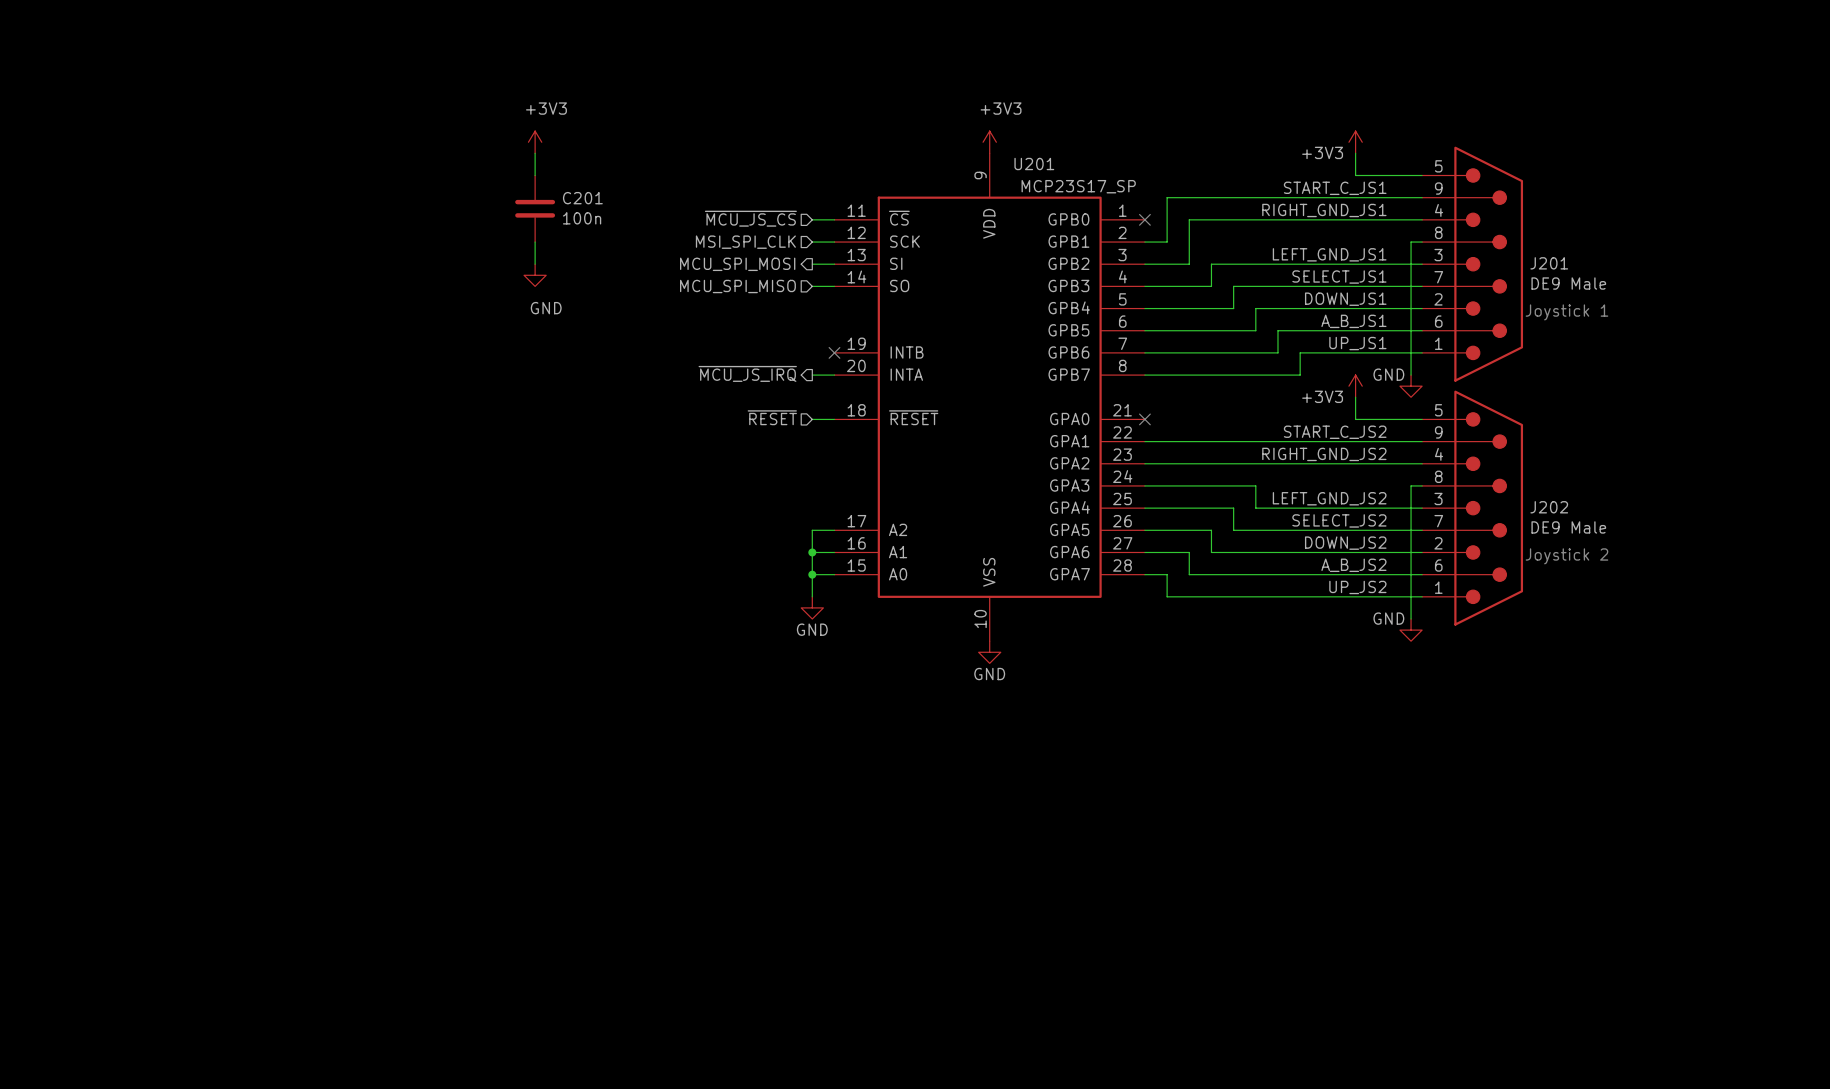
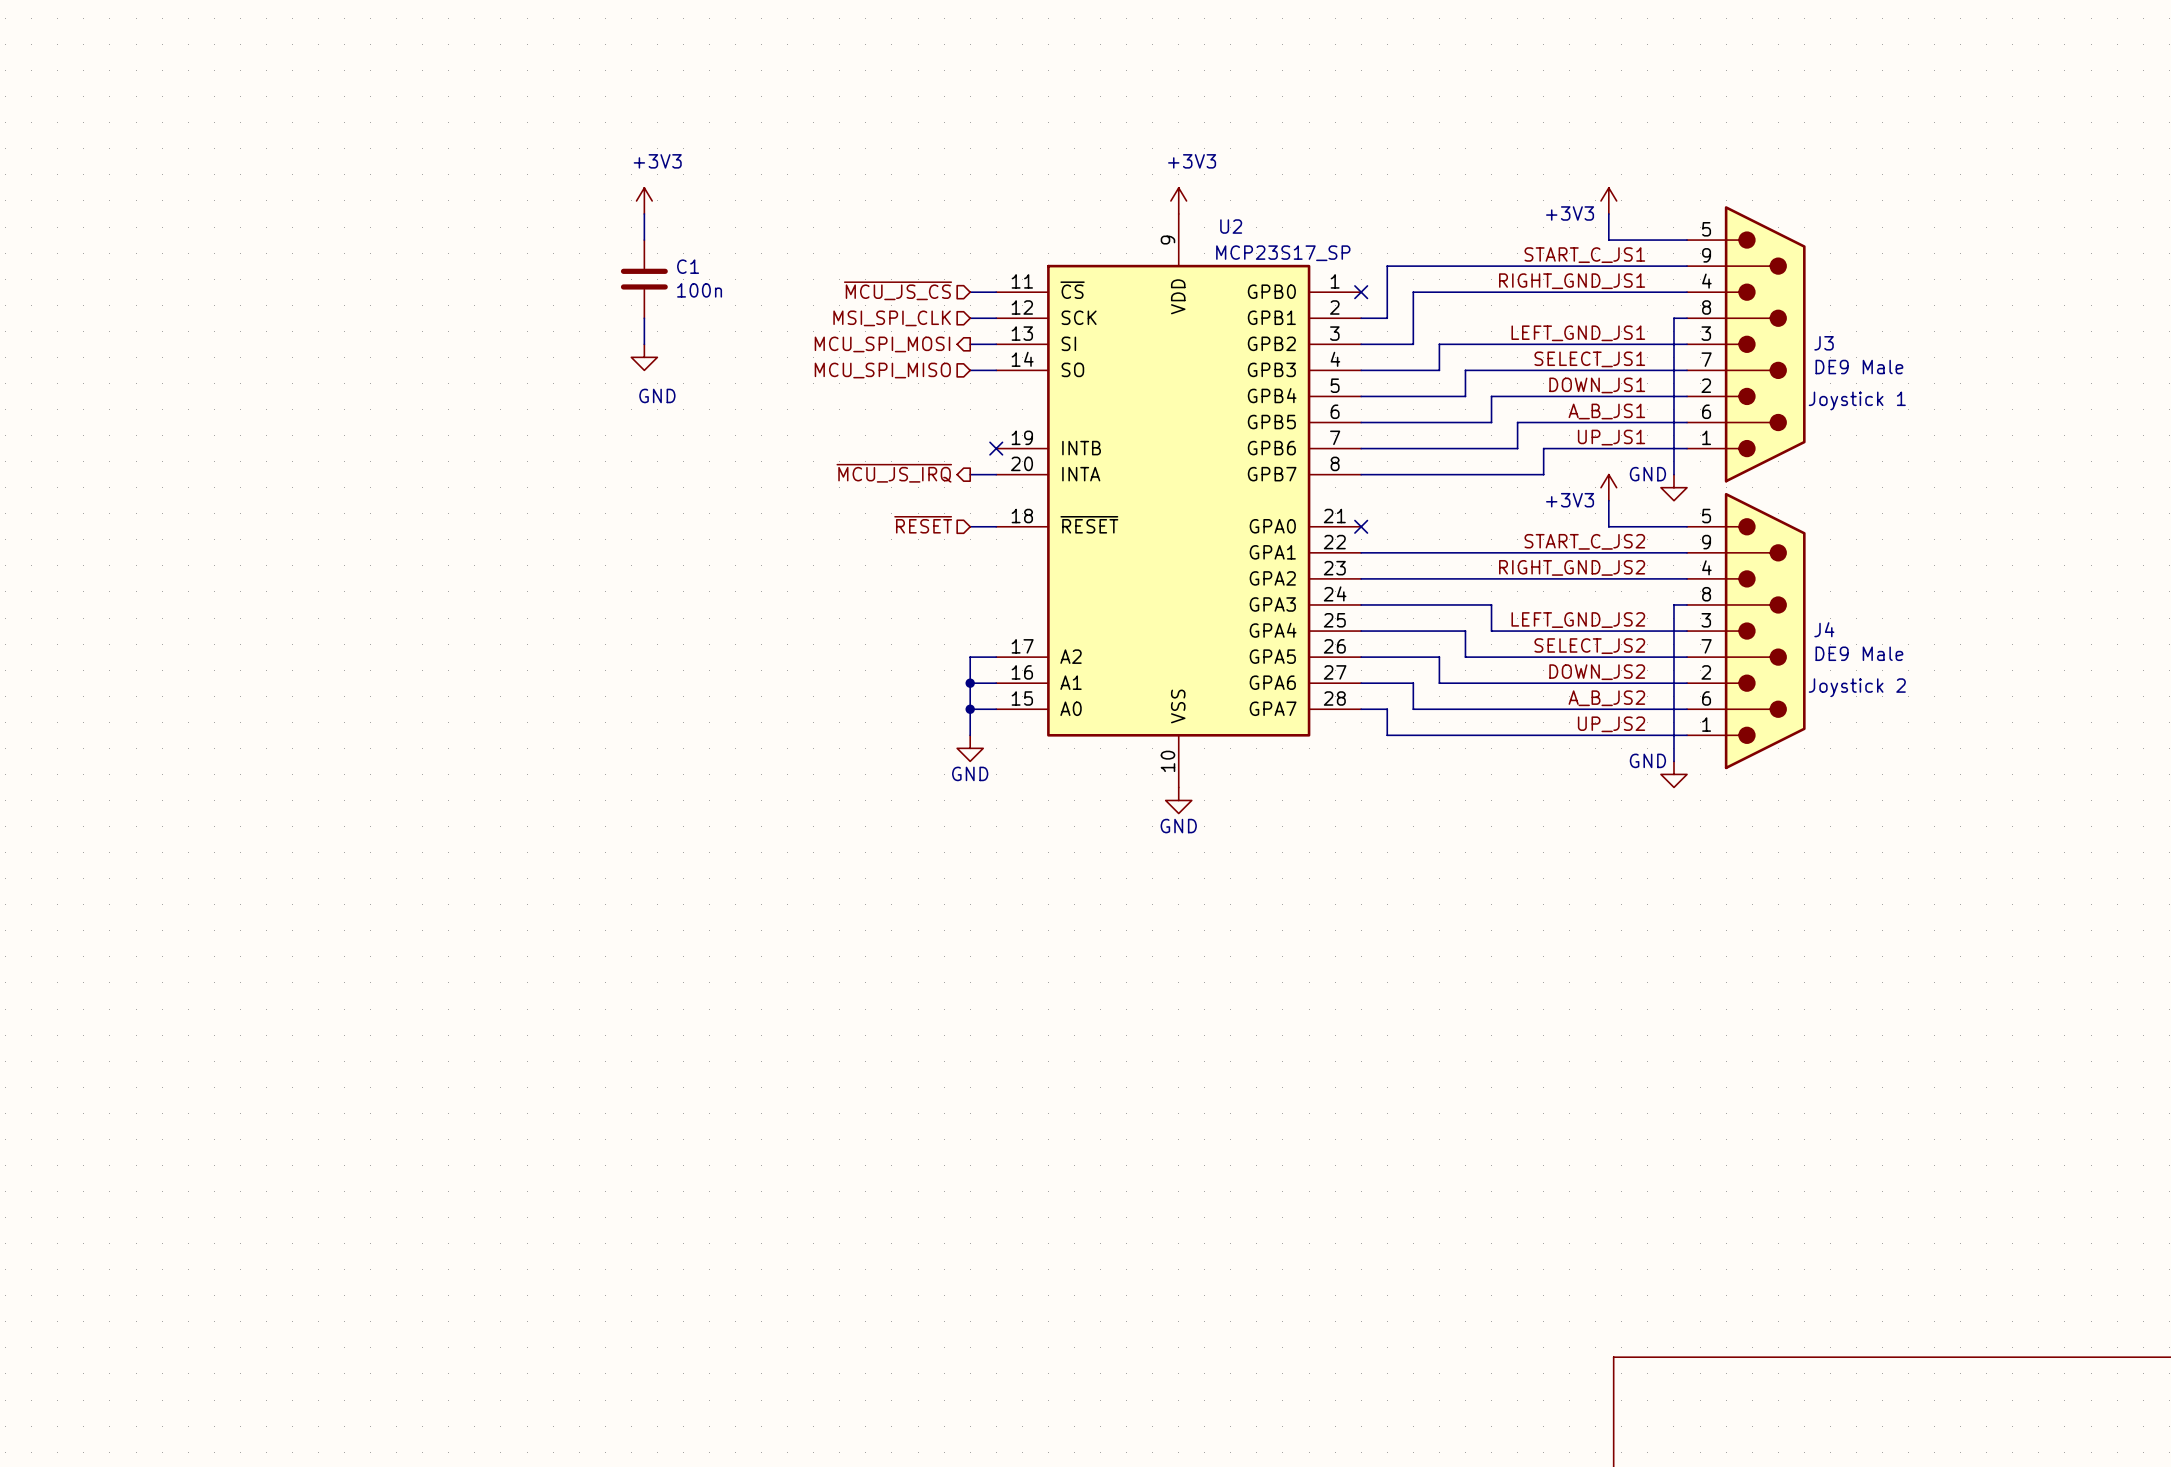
U201 name: U201 (1034, 164) -> U2 (1231, 226)
C201 name: C201 (582, 198) -> C1 (688, 266)
J201 name: J201 (1549, 263) -> J3 (1824, 343)
J202 name: J202 (1549, 507) -> J4 (1824, 629)

